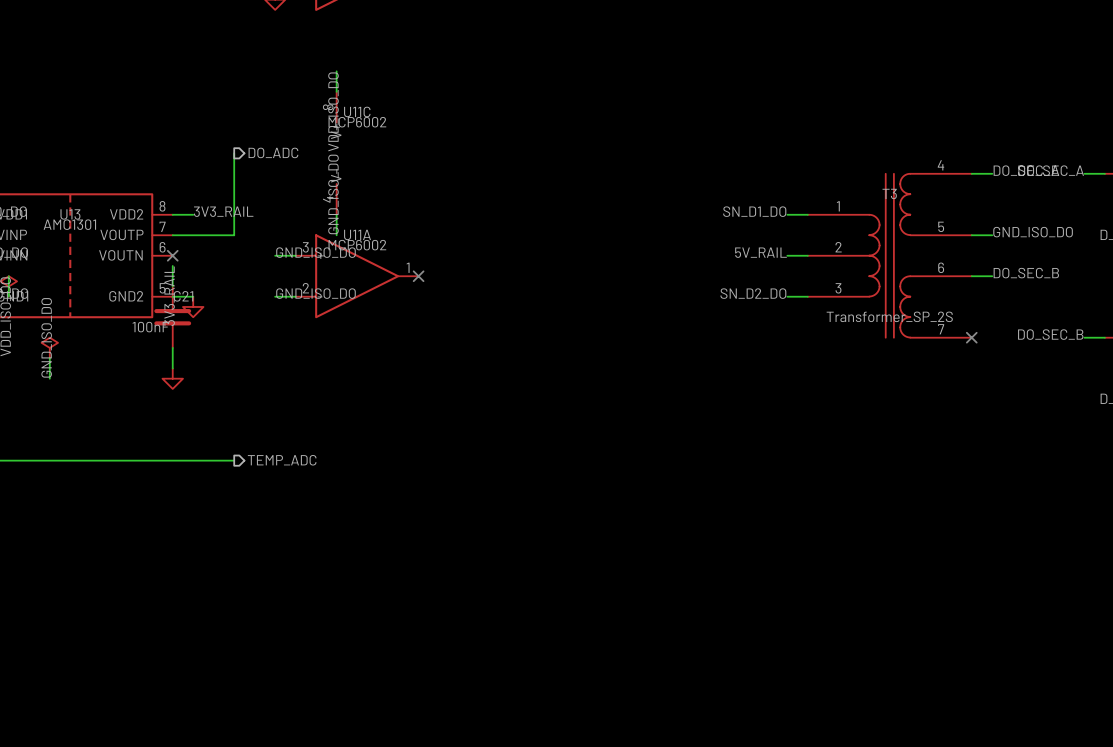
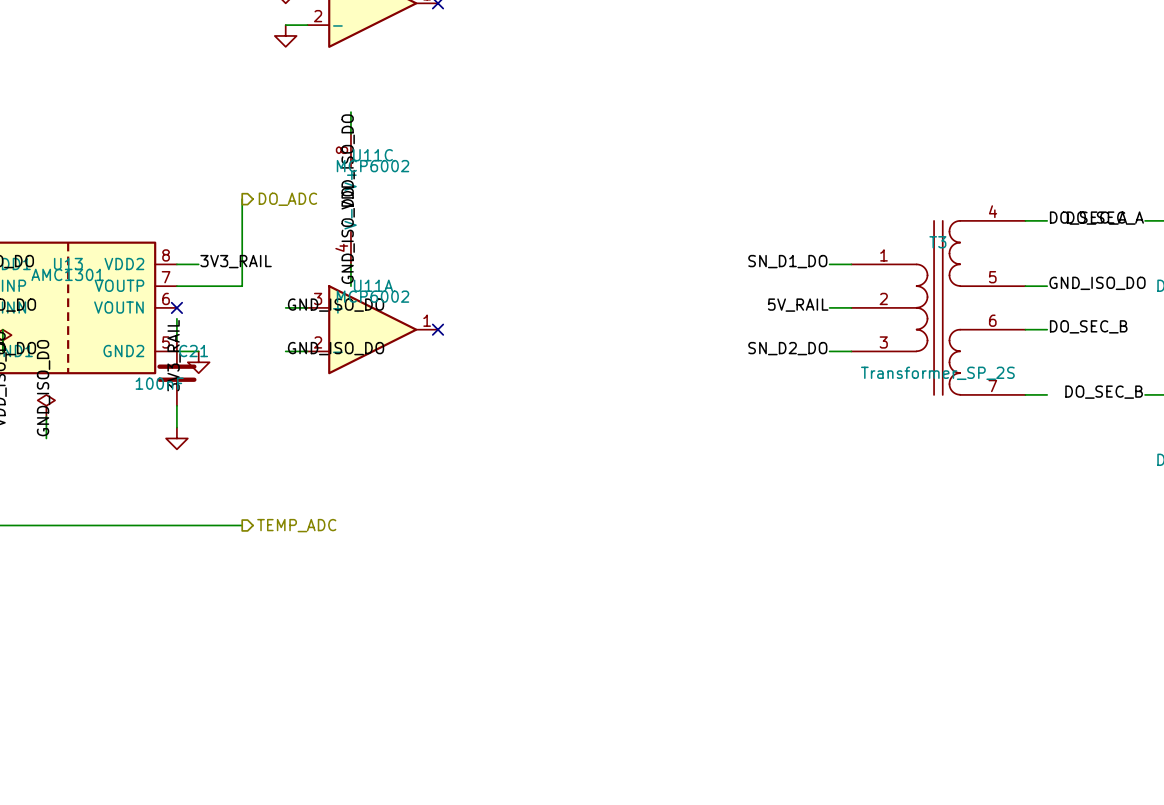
wire: none -> (1025, 394) (1047, 394)
no-connect mark: (971, 337) -> none

